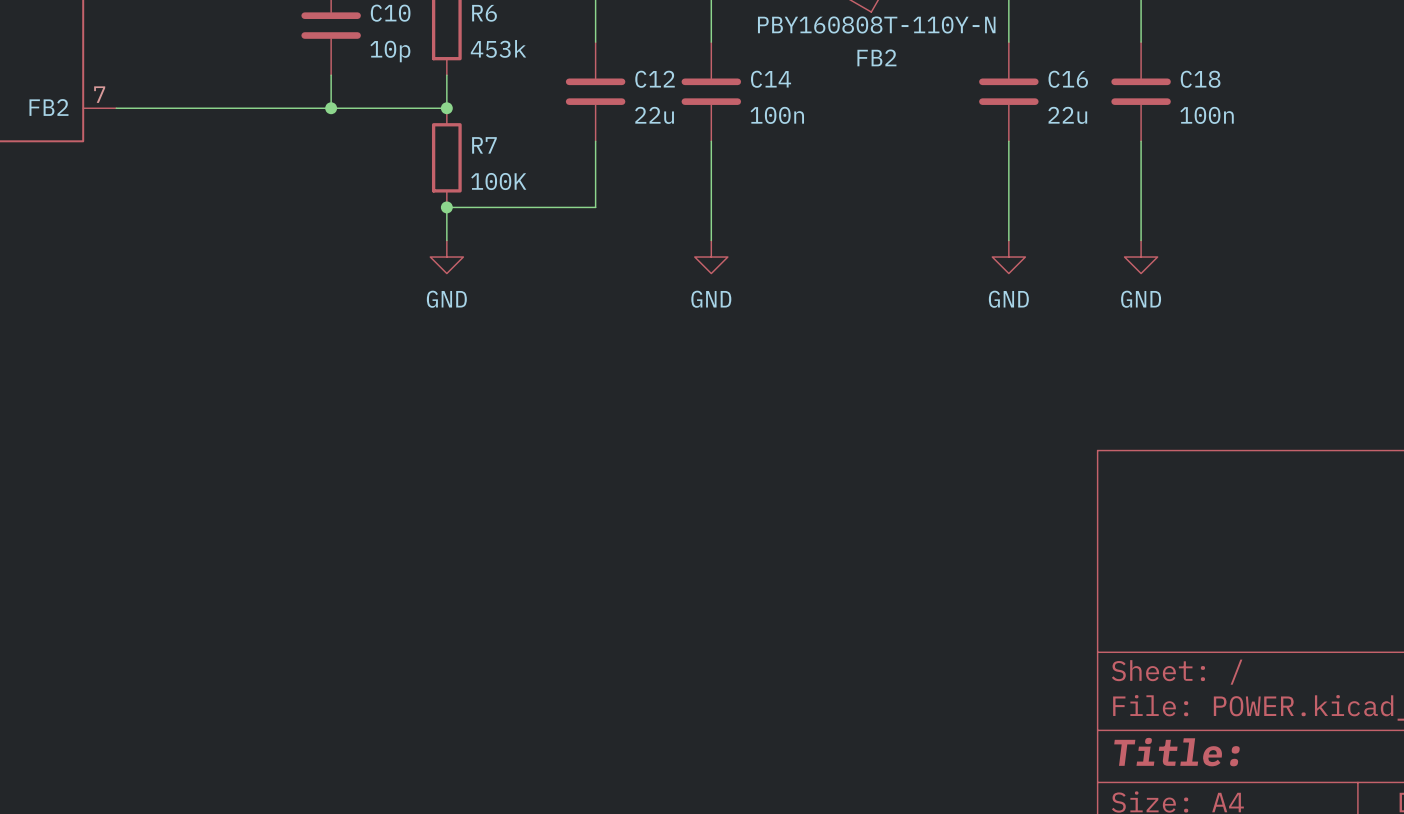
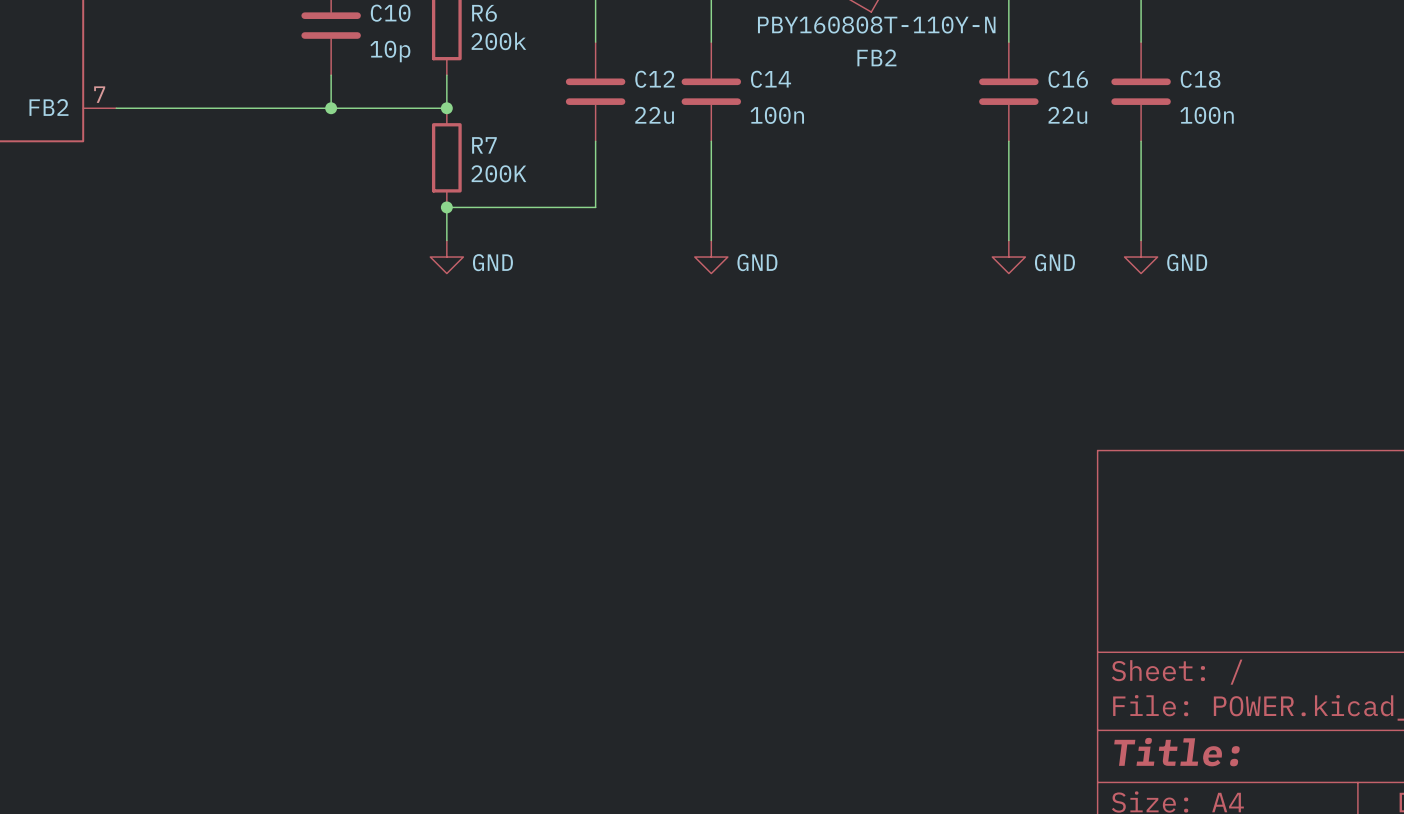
R6 value: 453k (498, 48) -> 200k (498, 41)
R7 value: 100K (498, 181) -> 200K (498, 173)
power symbol text position: GND (446, 299) -> GND (492, 262)
power symbol text position: GND (711, 299) -> GND (757, 262)
power symbol text position: GND (1008, 299) -> GND (1054, 262)
power symbol text position: GND (1141, 299) -> GND (1187, 262)

